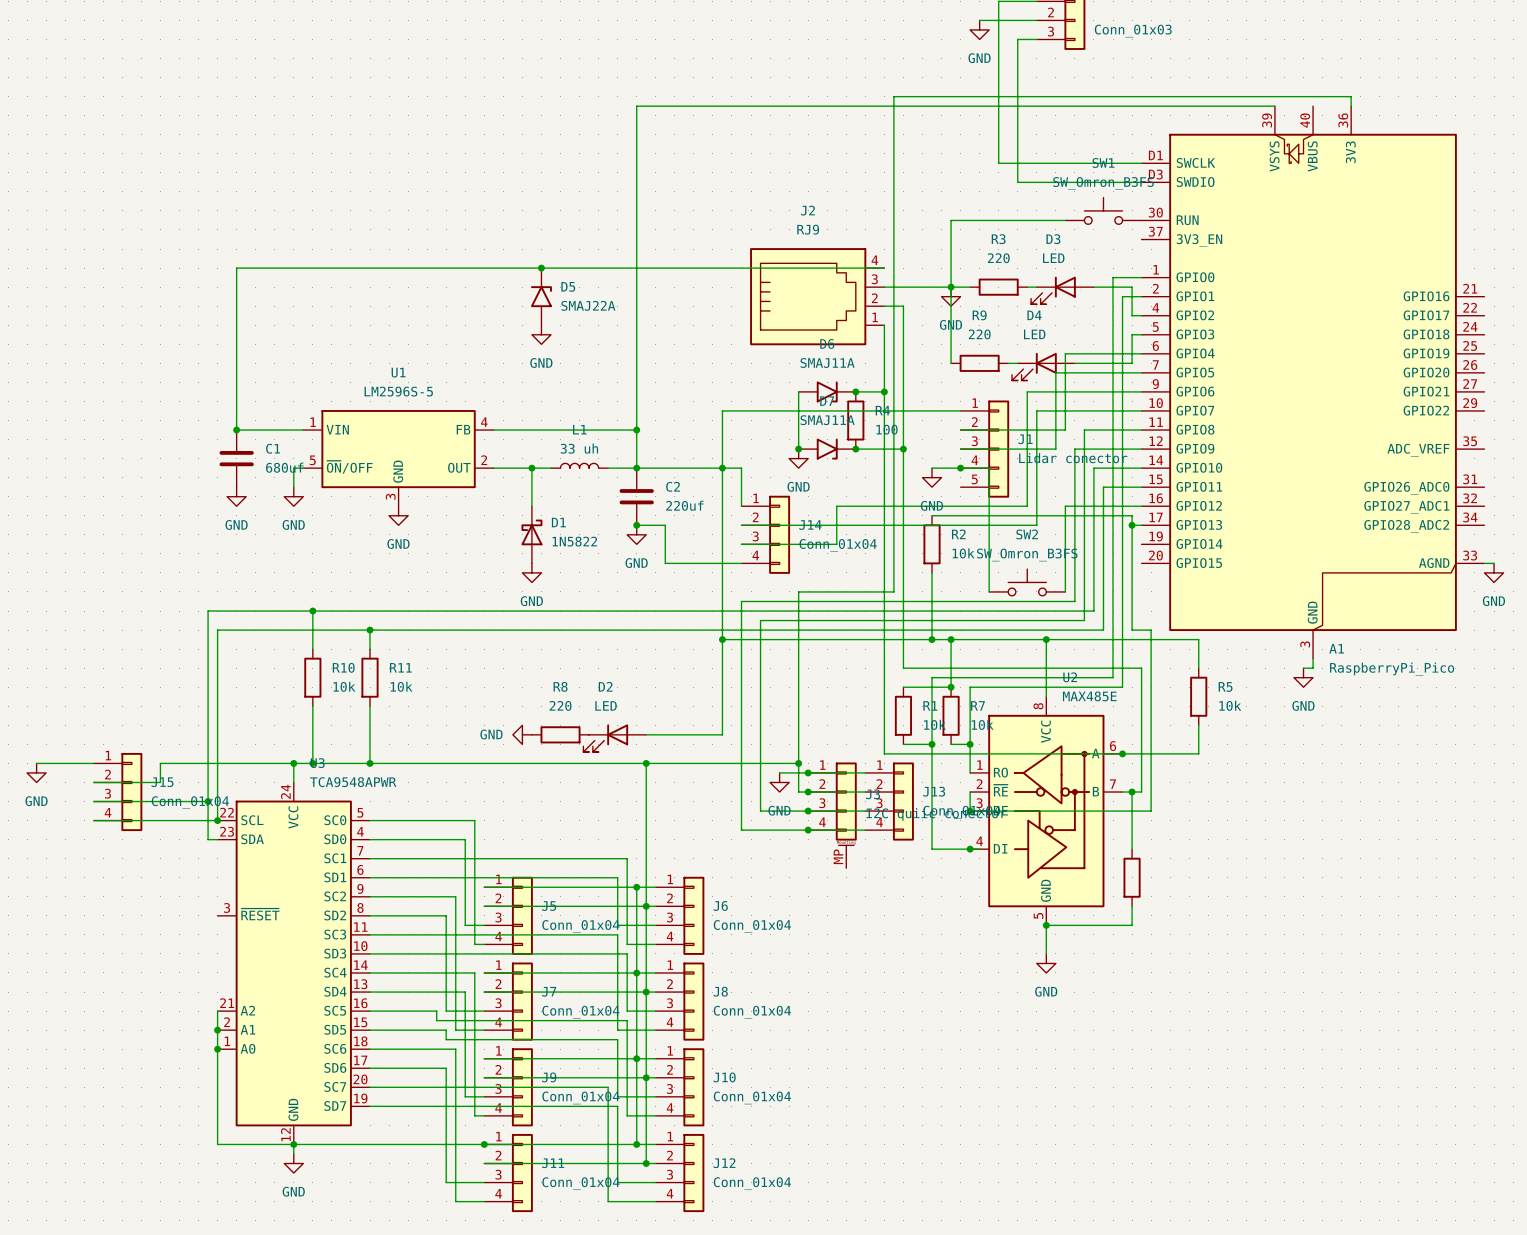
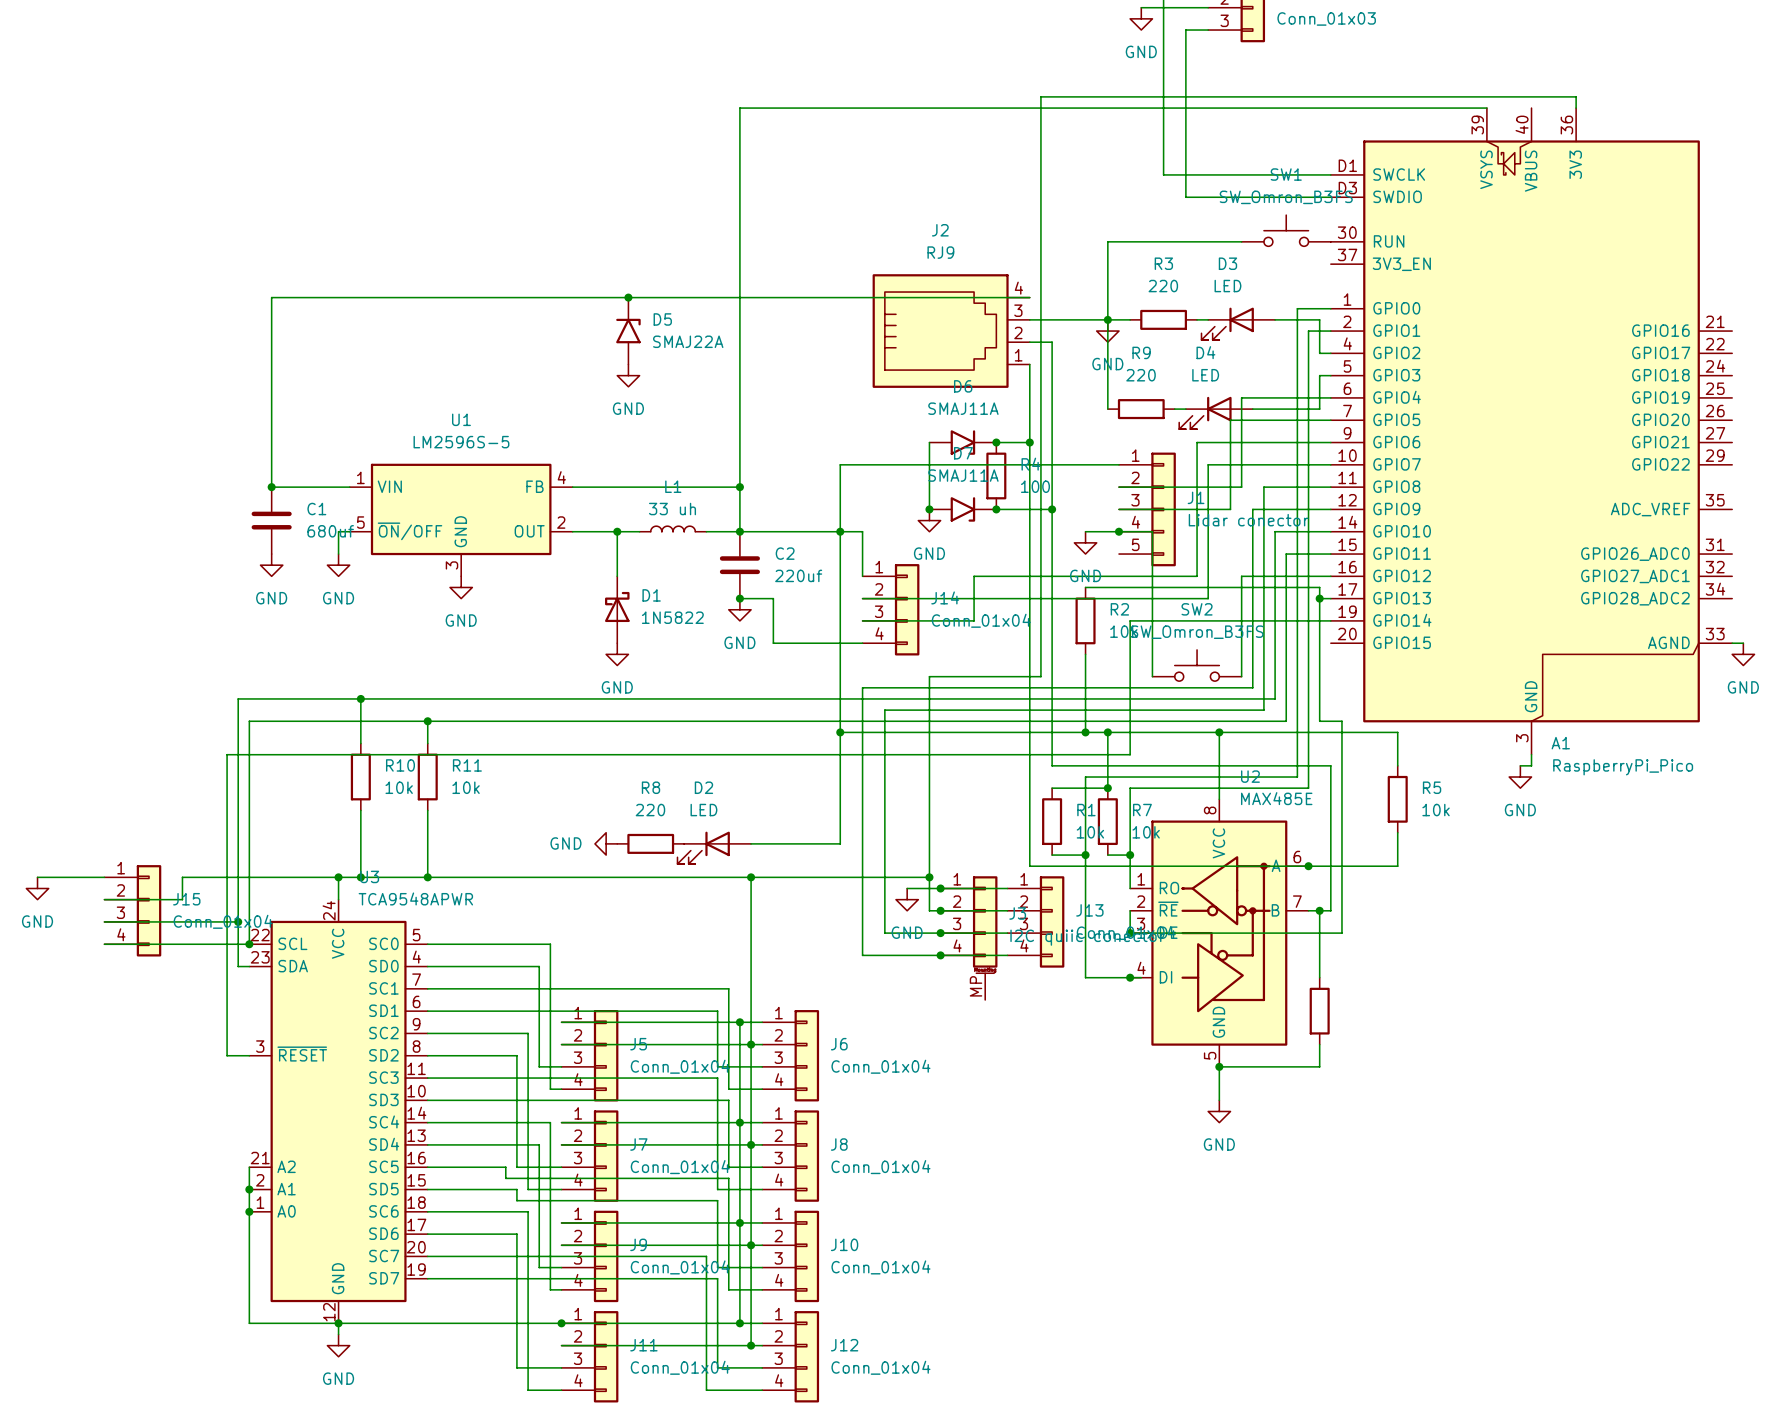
wire: none -> (1330, 620) (1130, 620) (1130, 754) (227, 754) (227, 1055) (249, 1055)

